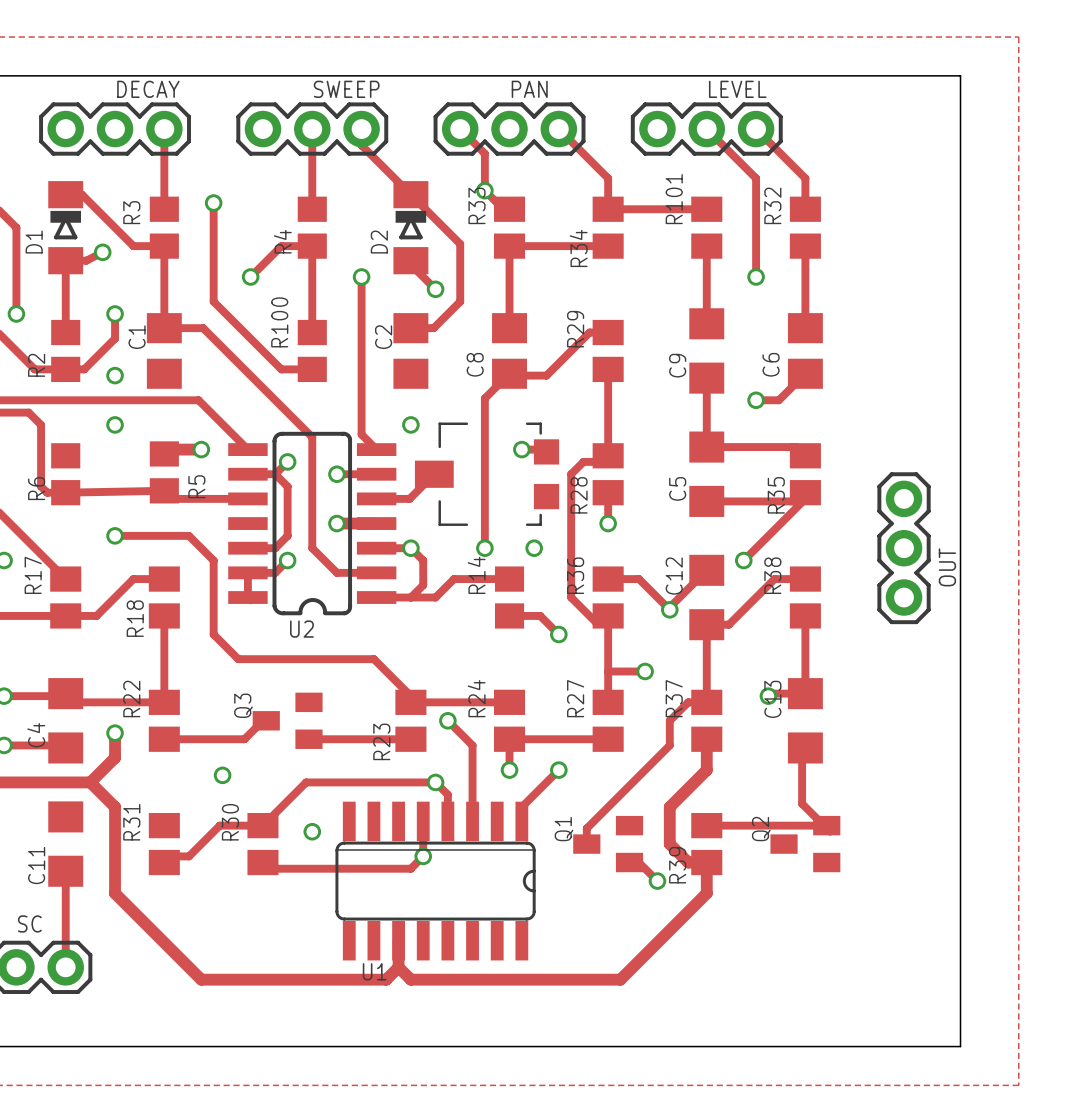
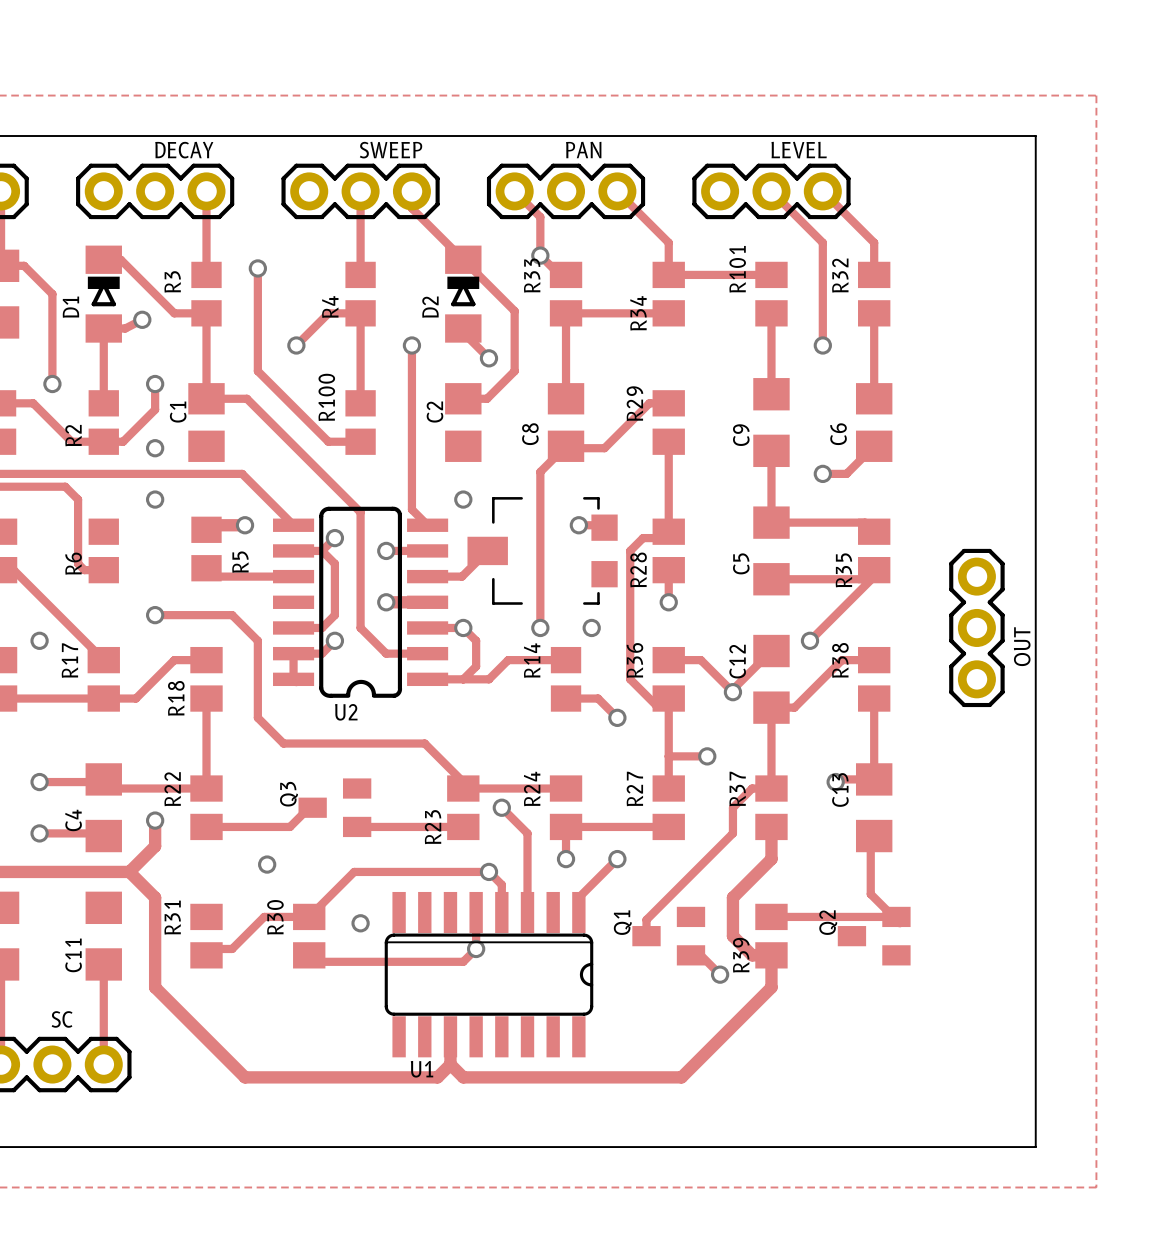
track: (65, 492) (164, 490) (170, 498) -> none

